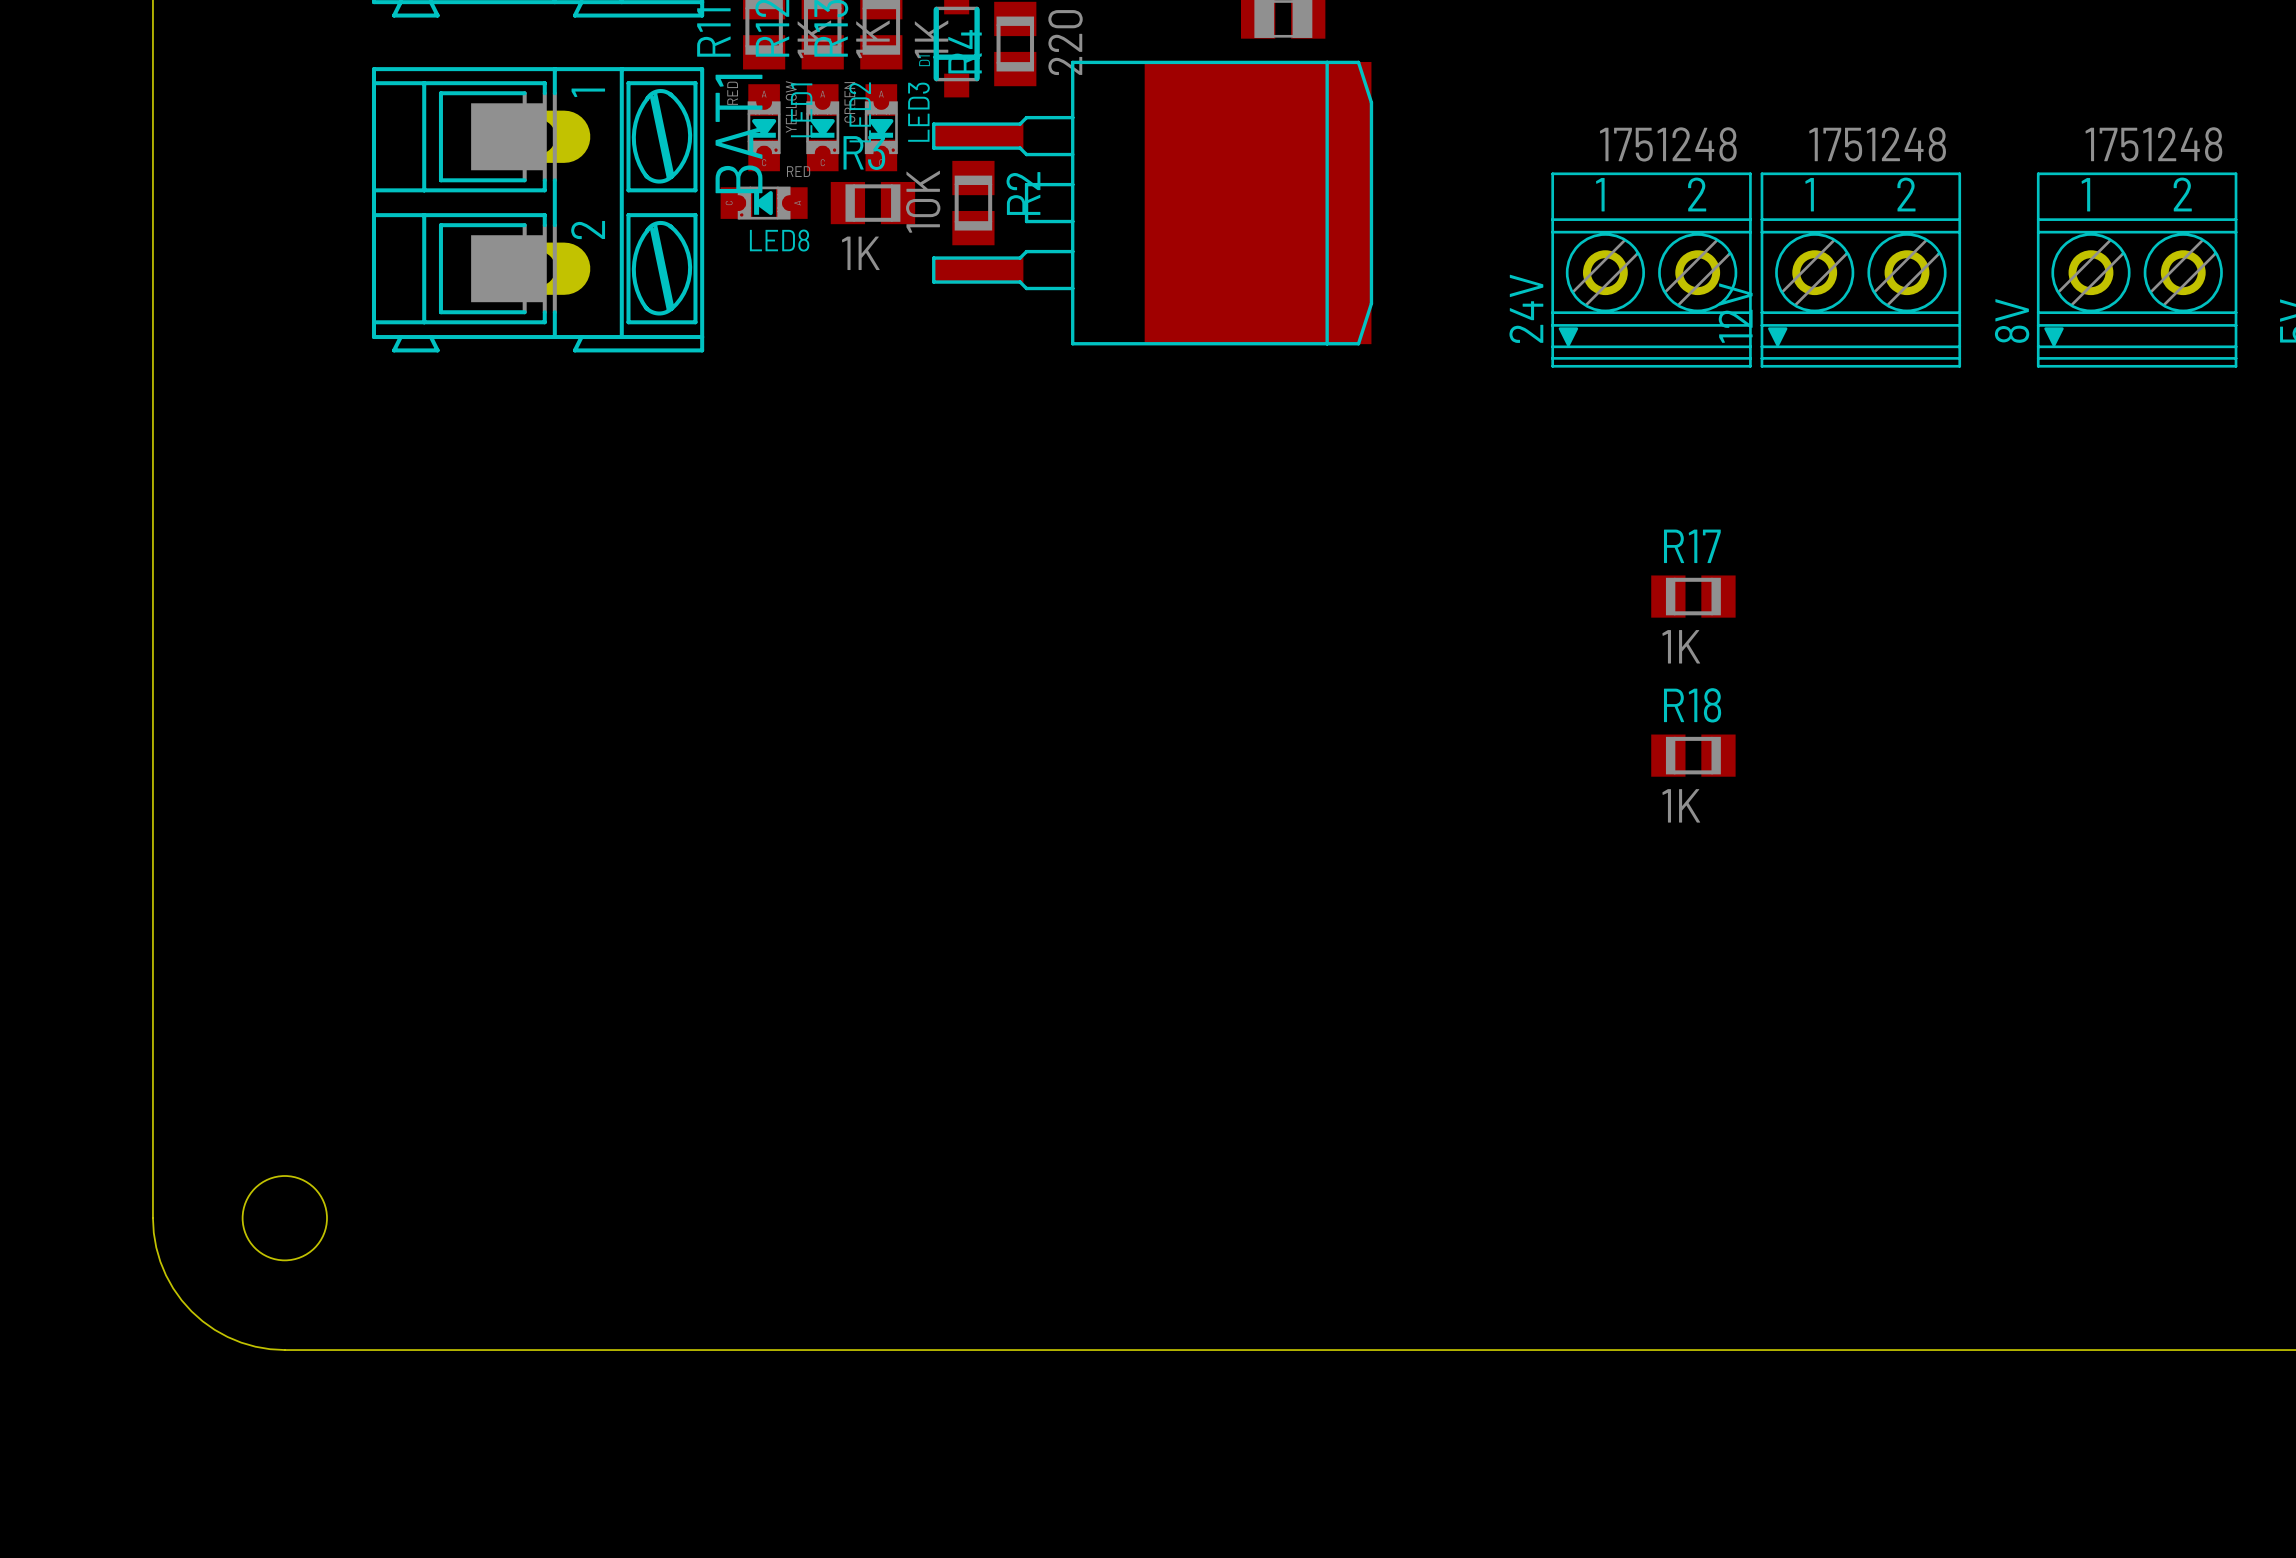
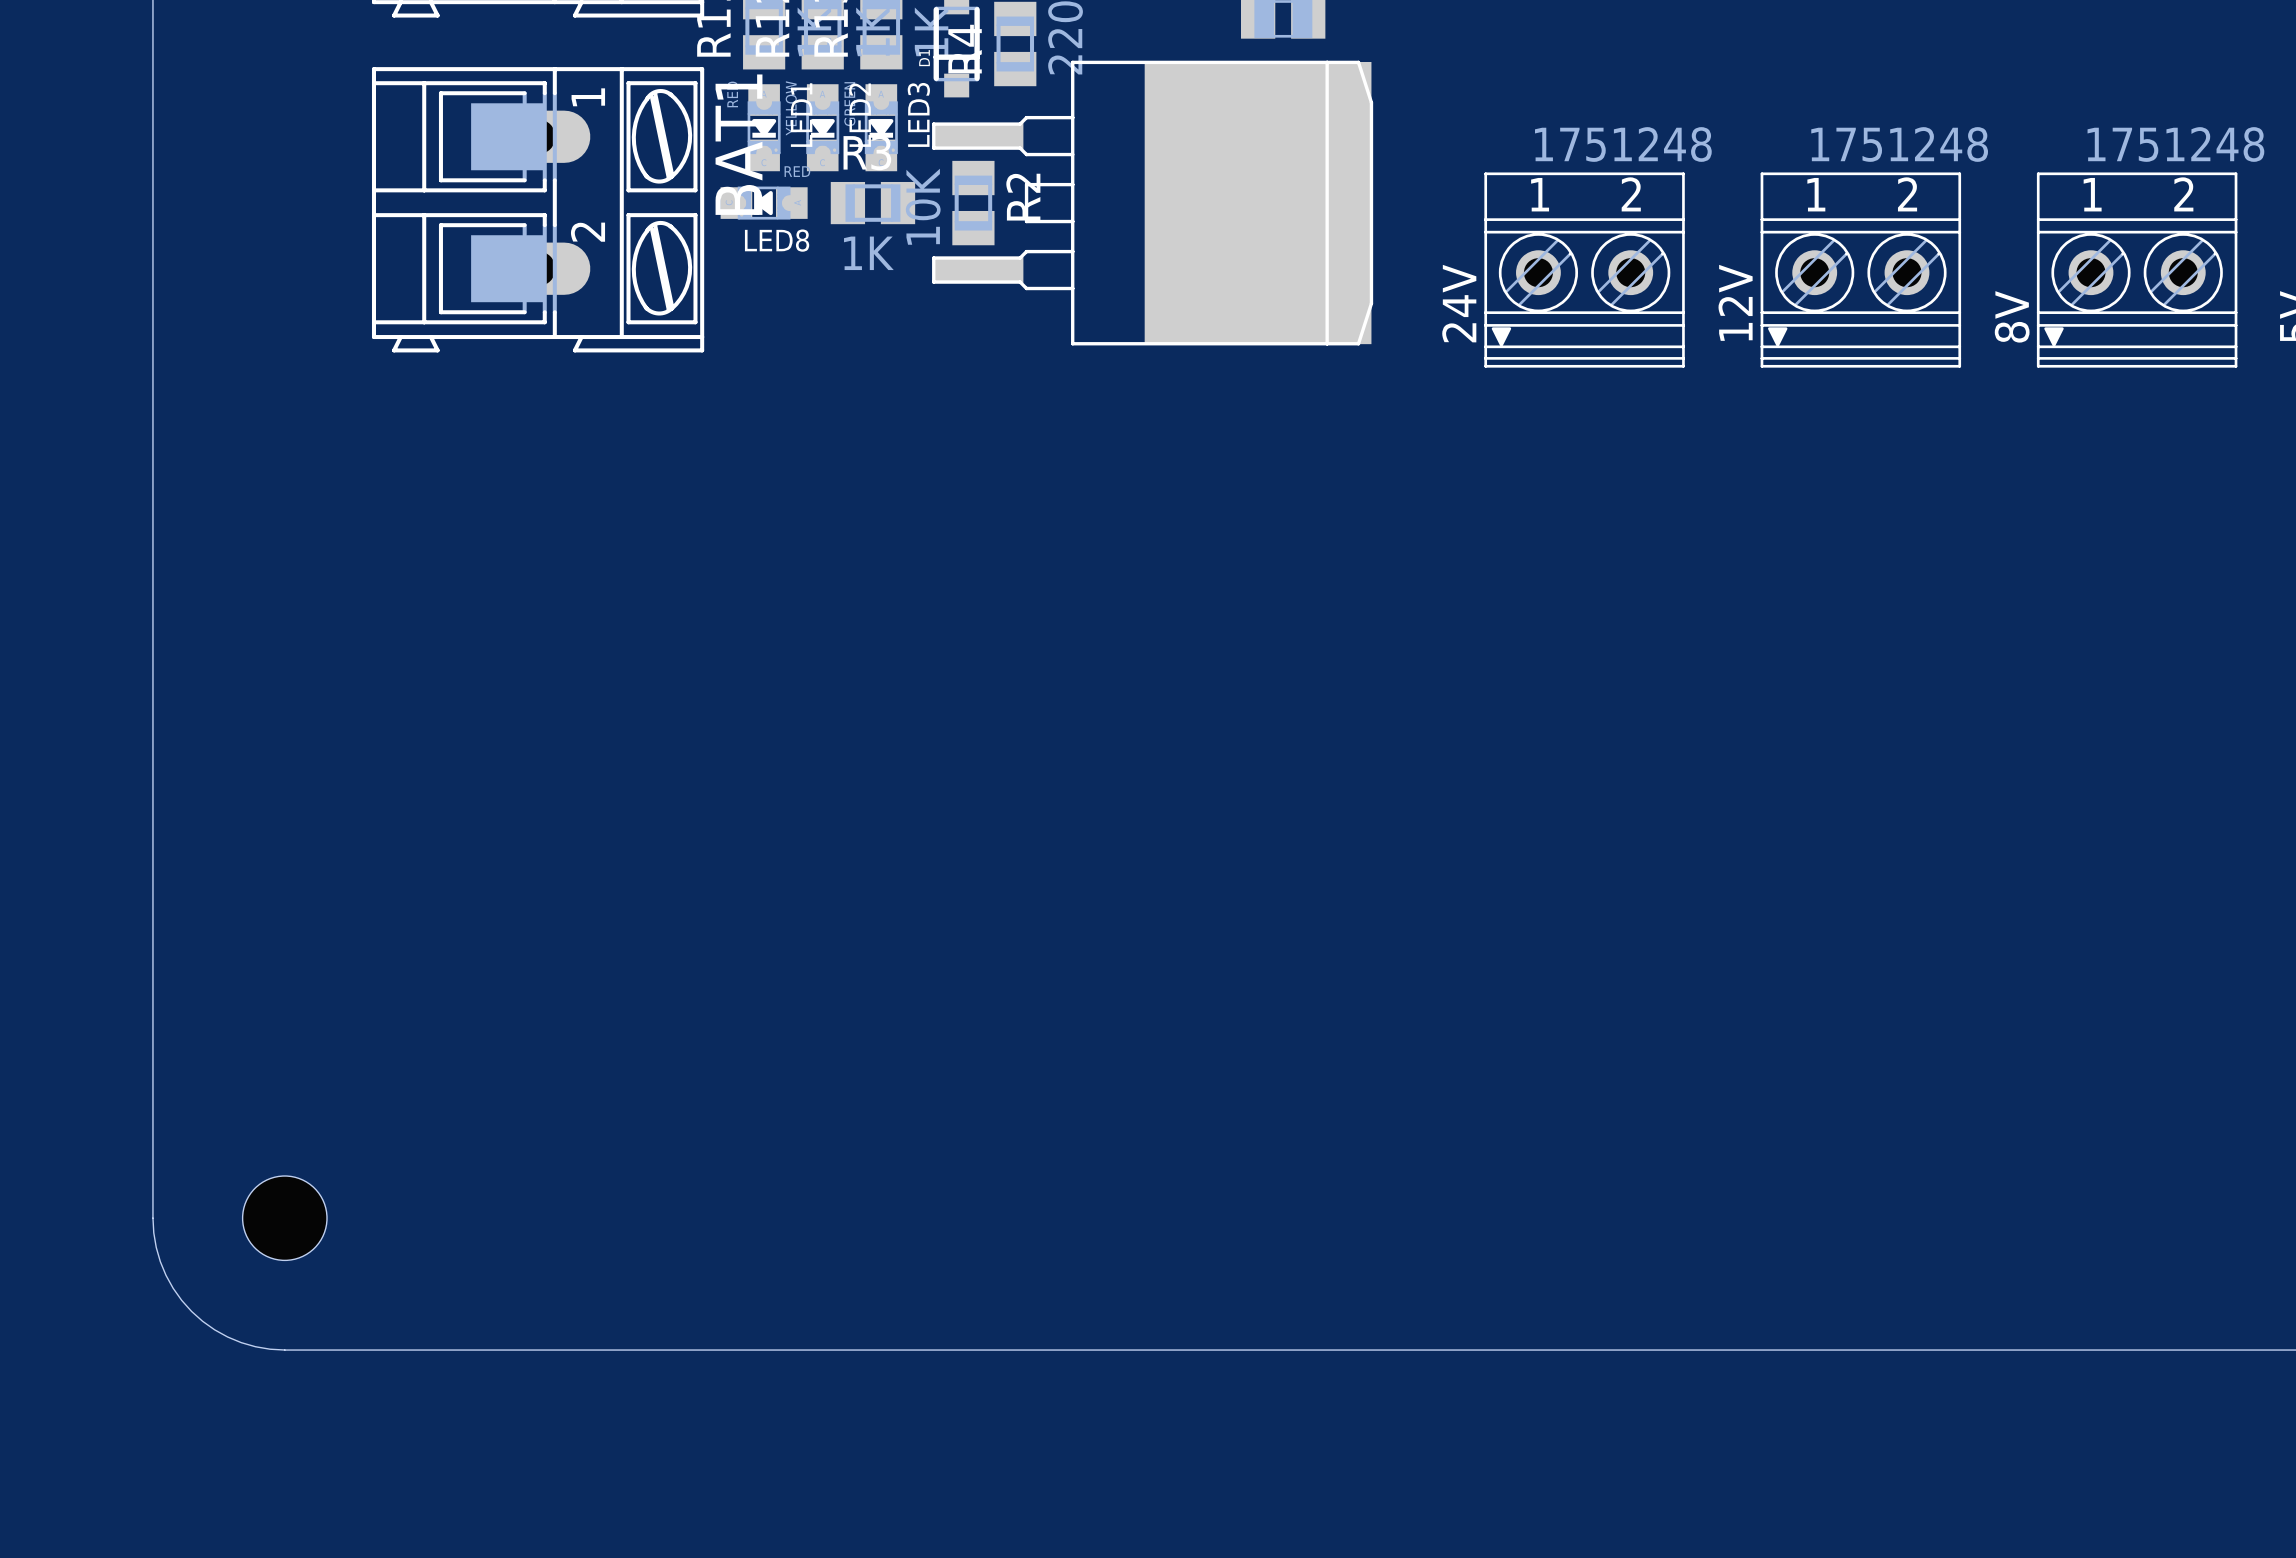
24V position: (1651, 270) -> (1584, 270)
R17: 1K (1693, 596) -> none
R18: 1K (1693, 755) -> none

